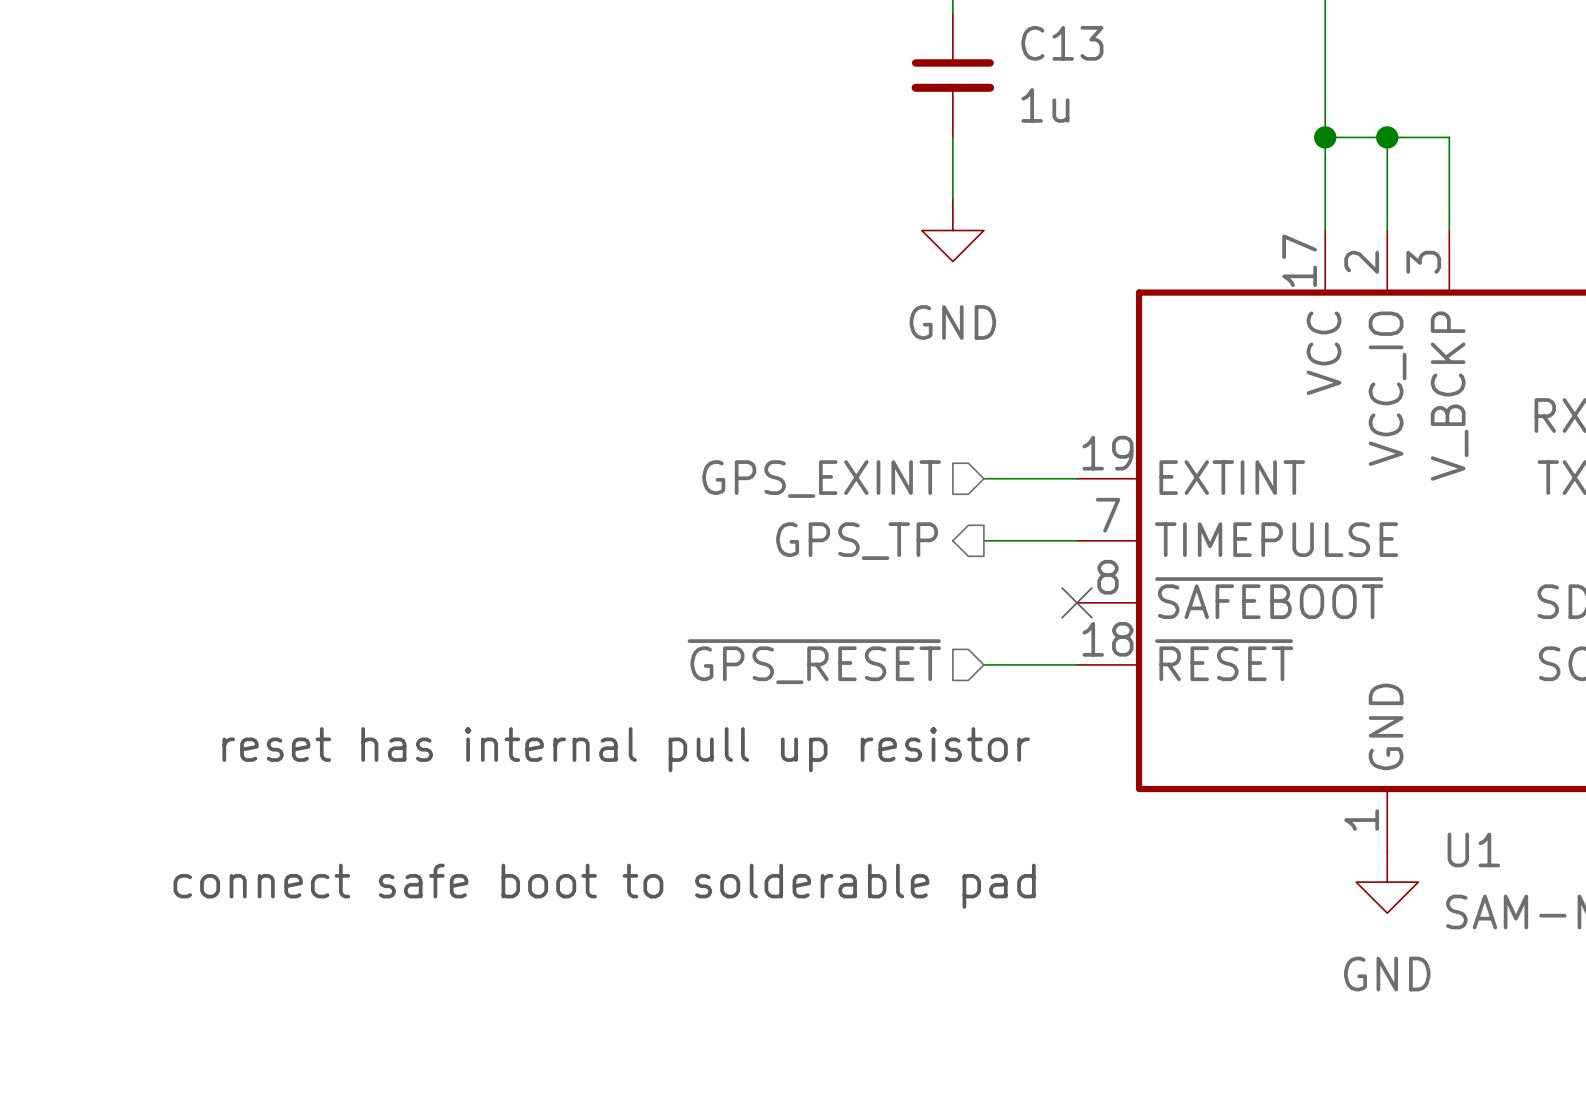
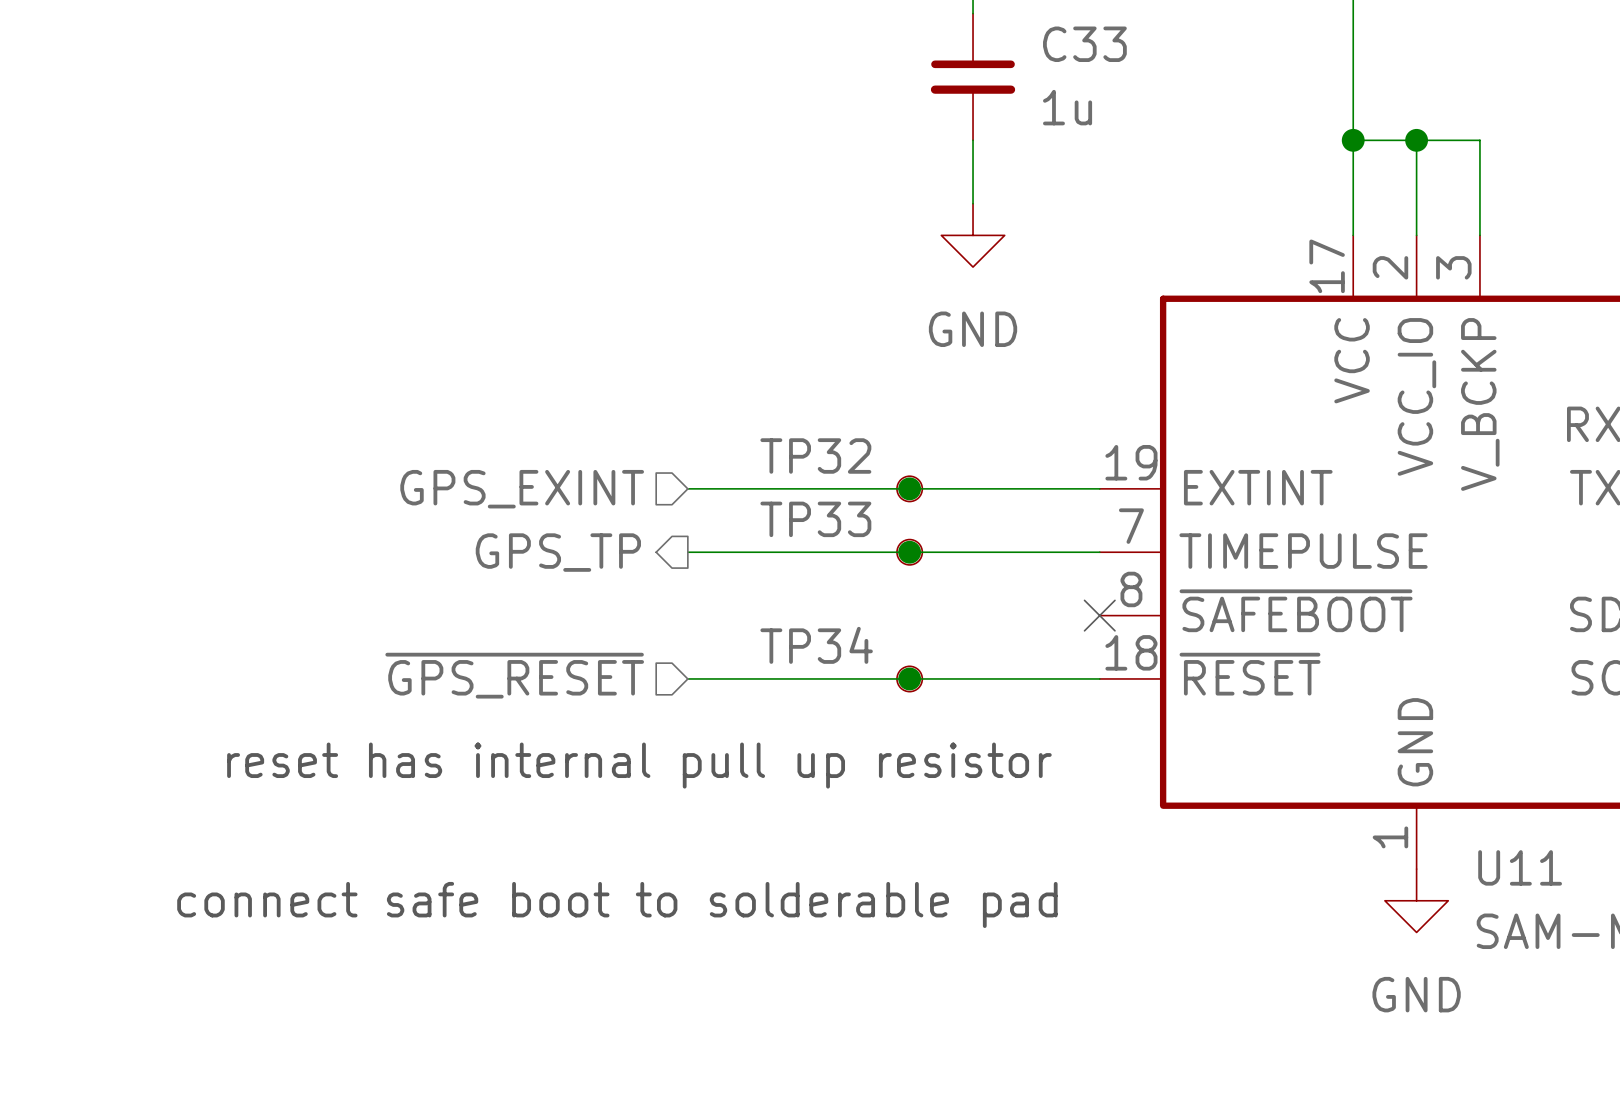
C13 name: C13 (1062, 43) -> C33 (1084, 44)
wire: none -> (687, 488) (1004, 488)
TP32: none -> (909, 488)
junction: none -> (909, 488)
hierarchical label position: GPS_EXINT (821, 479) -> GPS_EXINT (522, 489)
wire: none -> (687, 552) (1004, 552)
TP33: none -> (909, 552)
junction: none -> (909, 552)
hierarchical label position: GPS_TP (857, 541) -> GPS_TP (558, 552)
hierarchical label position: ~{GPS_RESET} (814, 661) -> ~{GPS_RESET} (514, 675)
wire: none -> (687, 678) (1004, 678)
TP34: none -> (909, 678)
junction: none -> (909, 678)
U1 name: U1 (1473, 849) -> U11 (1520, 867)

